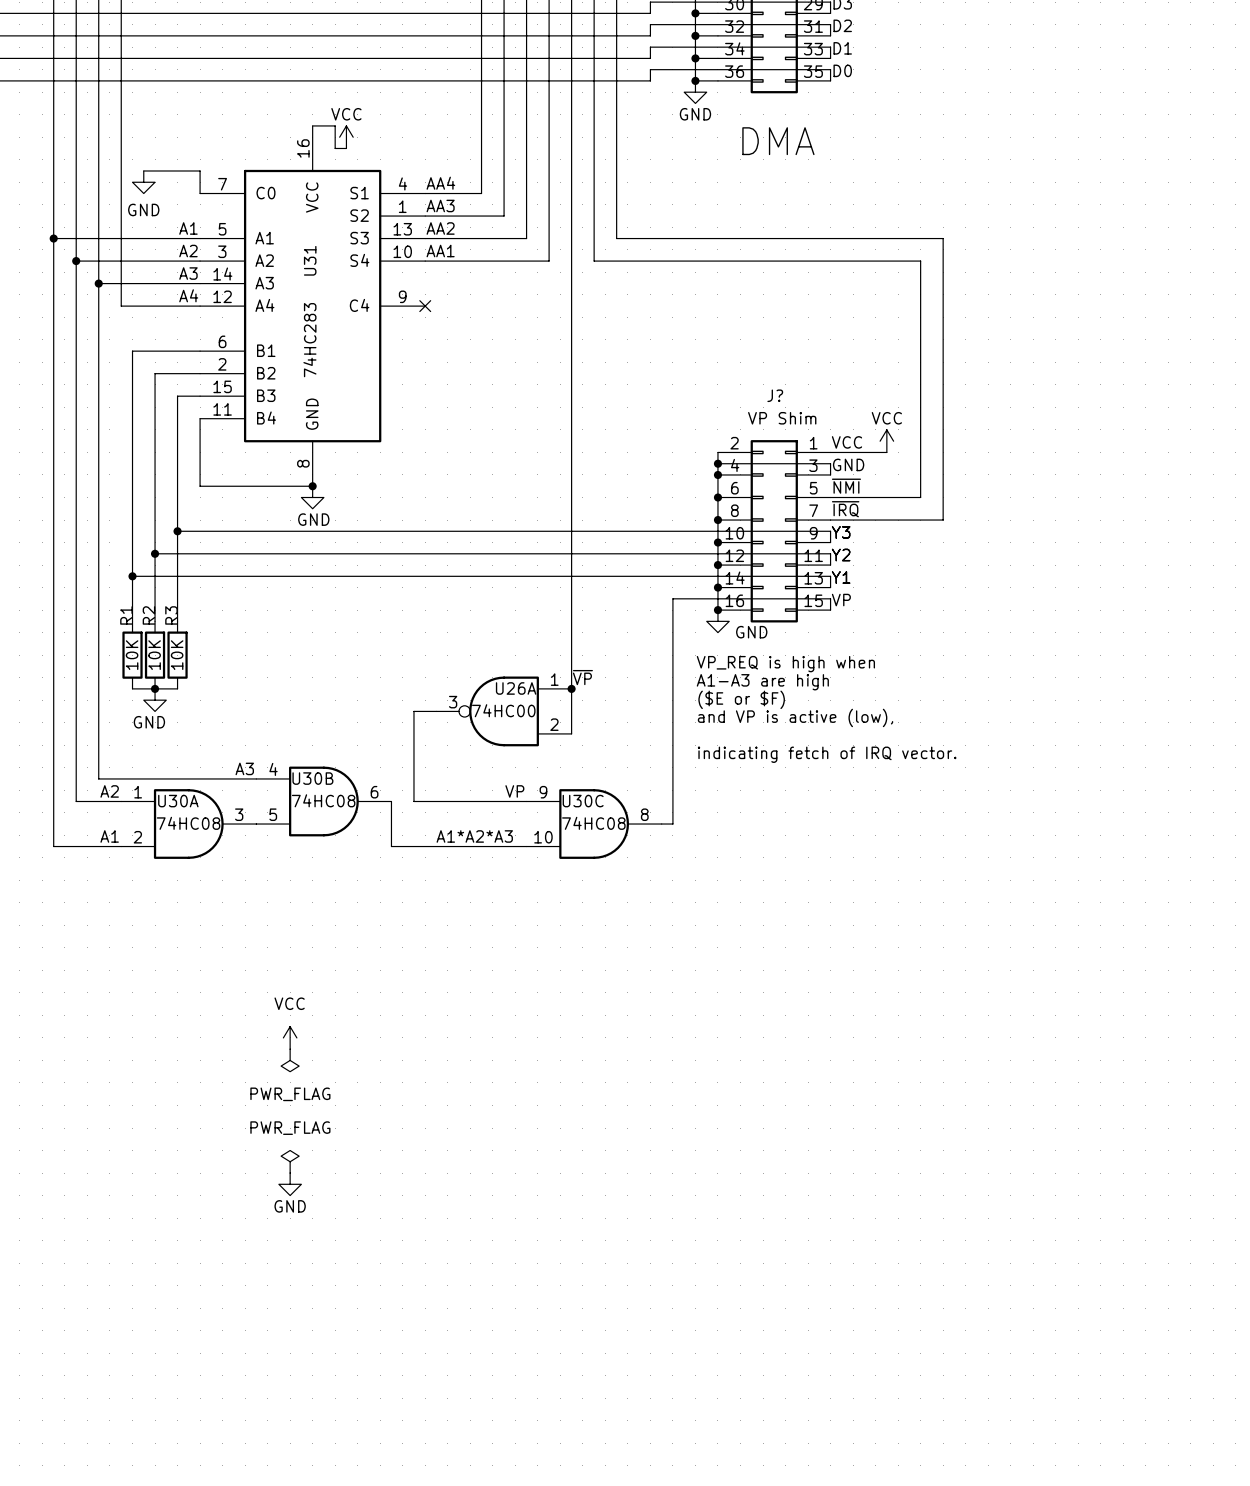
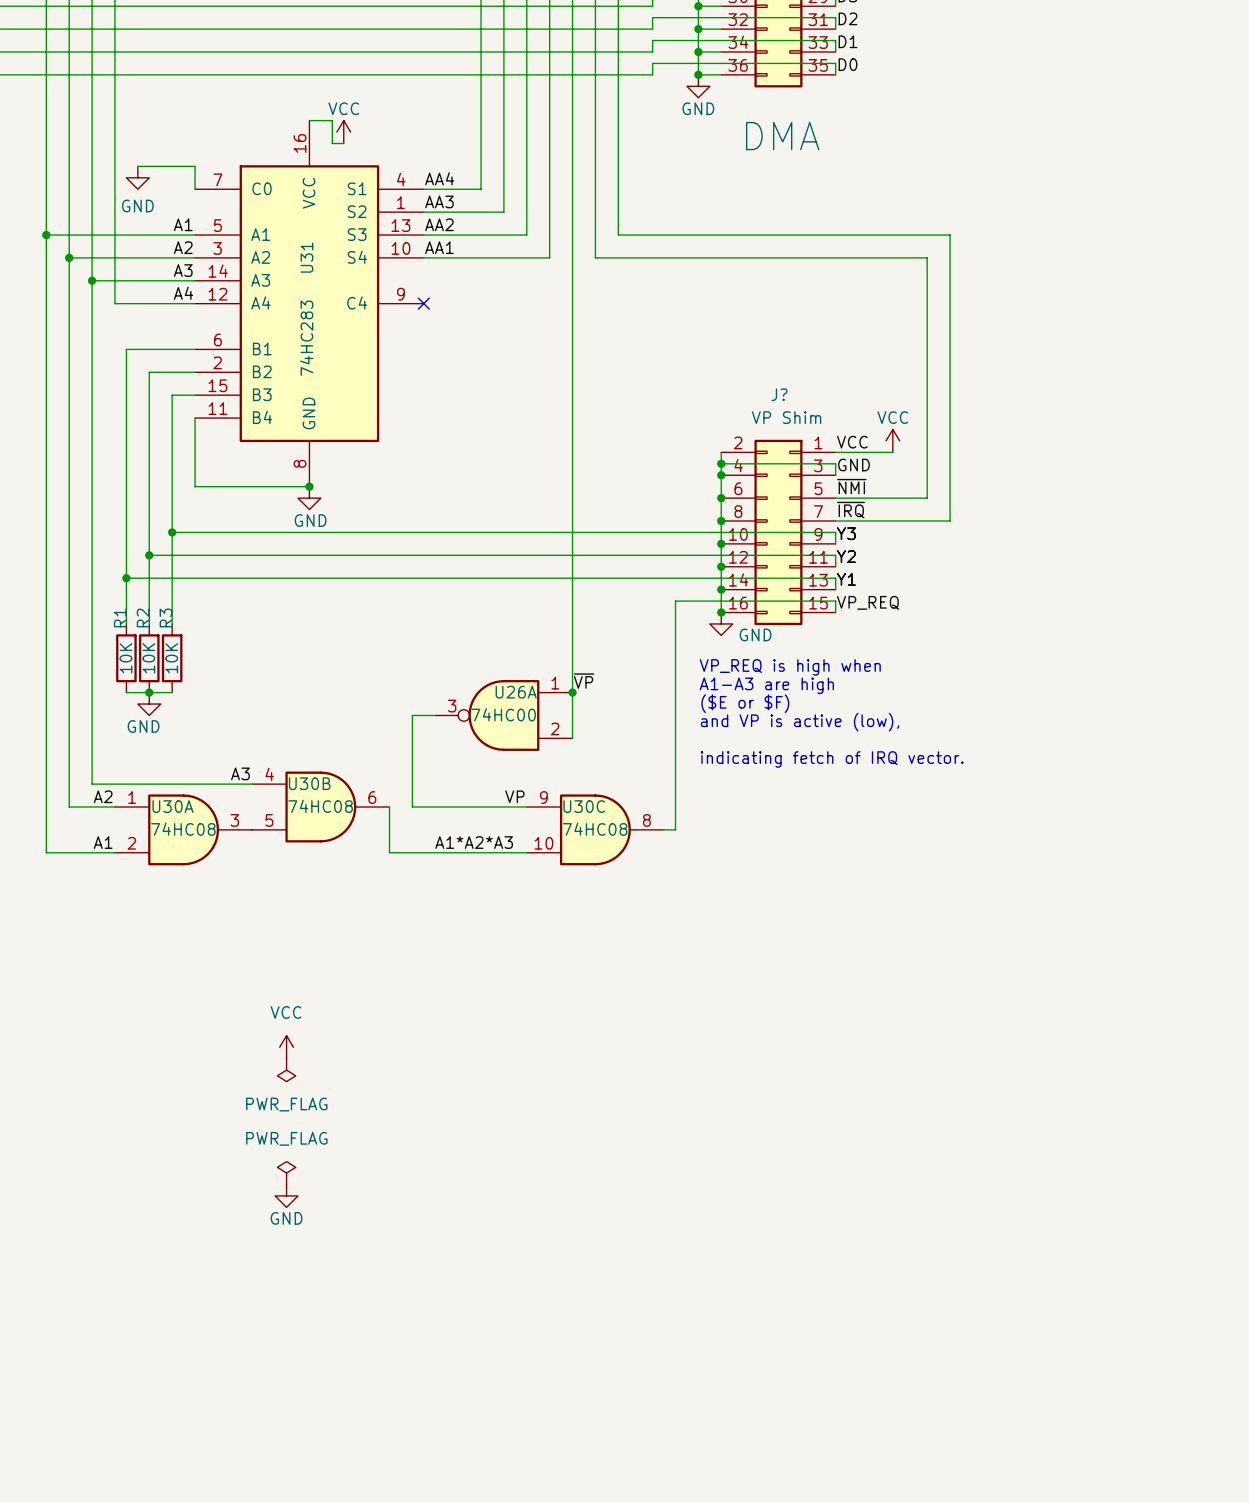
label: VP (841, 600) -> VP_REQ (868, 602)

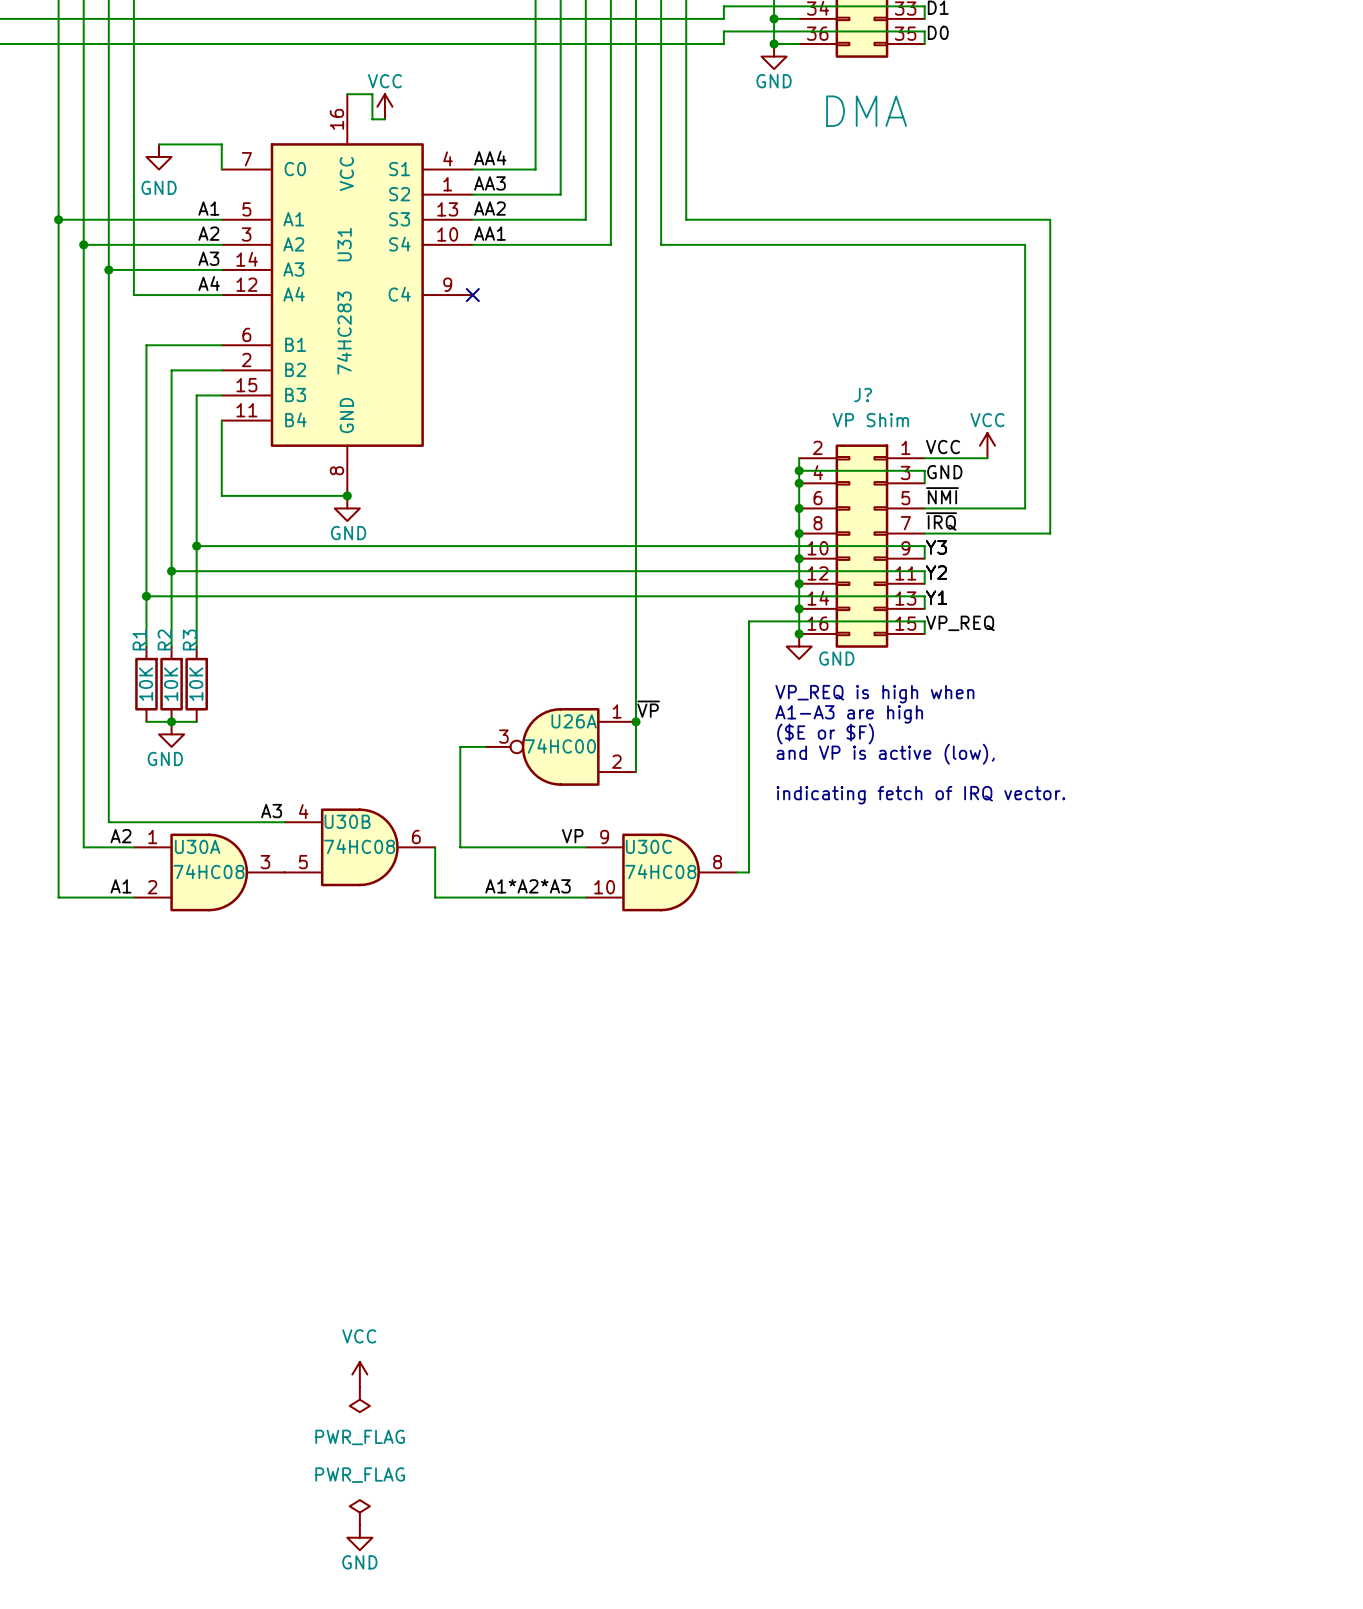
power symbol: VCC (286, 1047) -> none
power symbol: PWR_FLAG (286, 1070) -> none
power symbol: PWR_FLAG (286, 1173) -> none
power symbol: GND (286, 1195) -> none
power symbol: none -> VCC (359, 1374)
power symbol: none -> PWR_FLAG (359, 1399)
power symbol: none -> PWR_FLAG (359, 1512)
power symbol: none -> GND (359, 1537)

